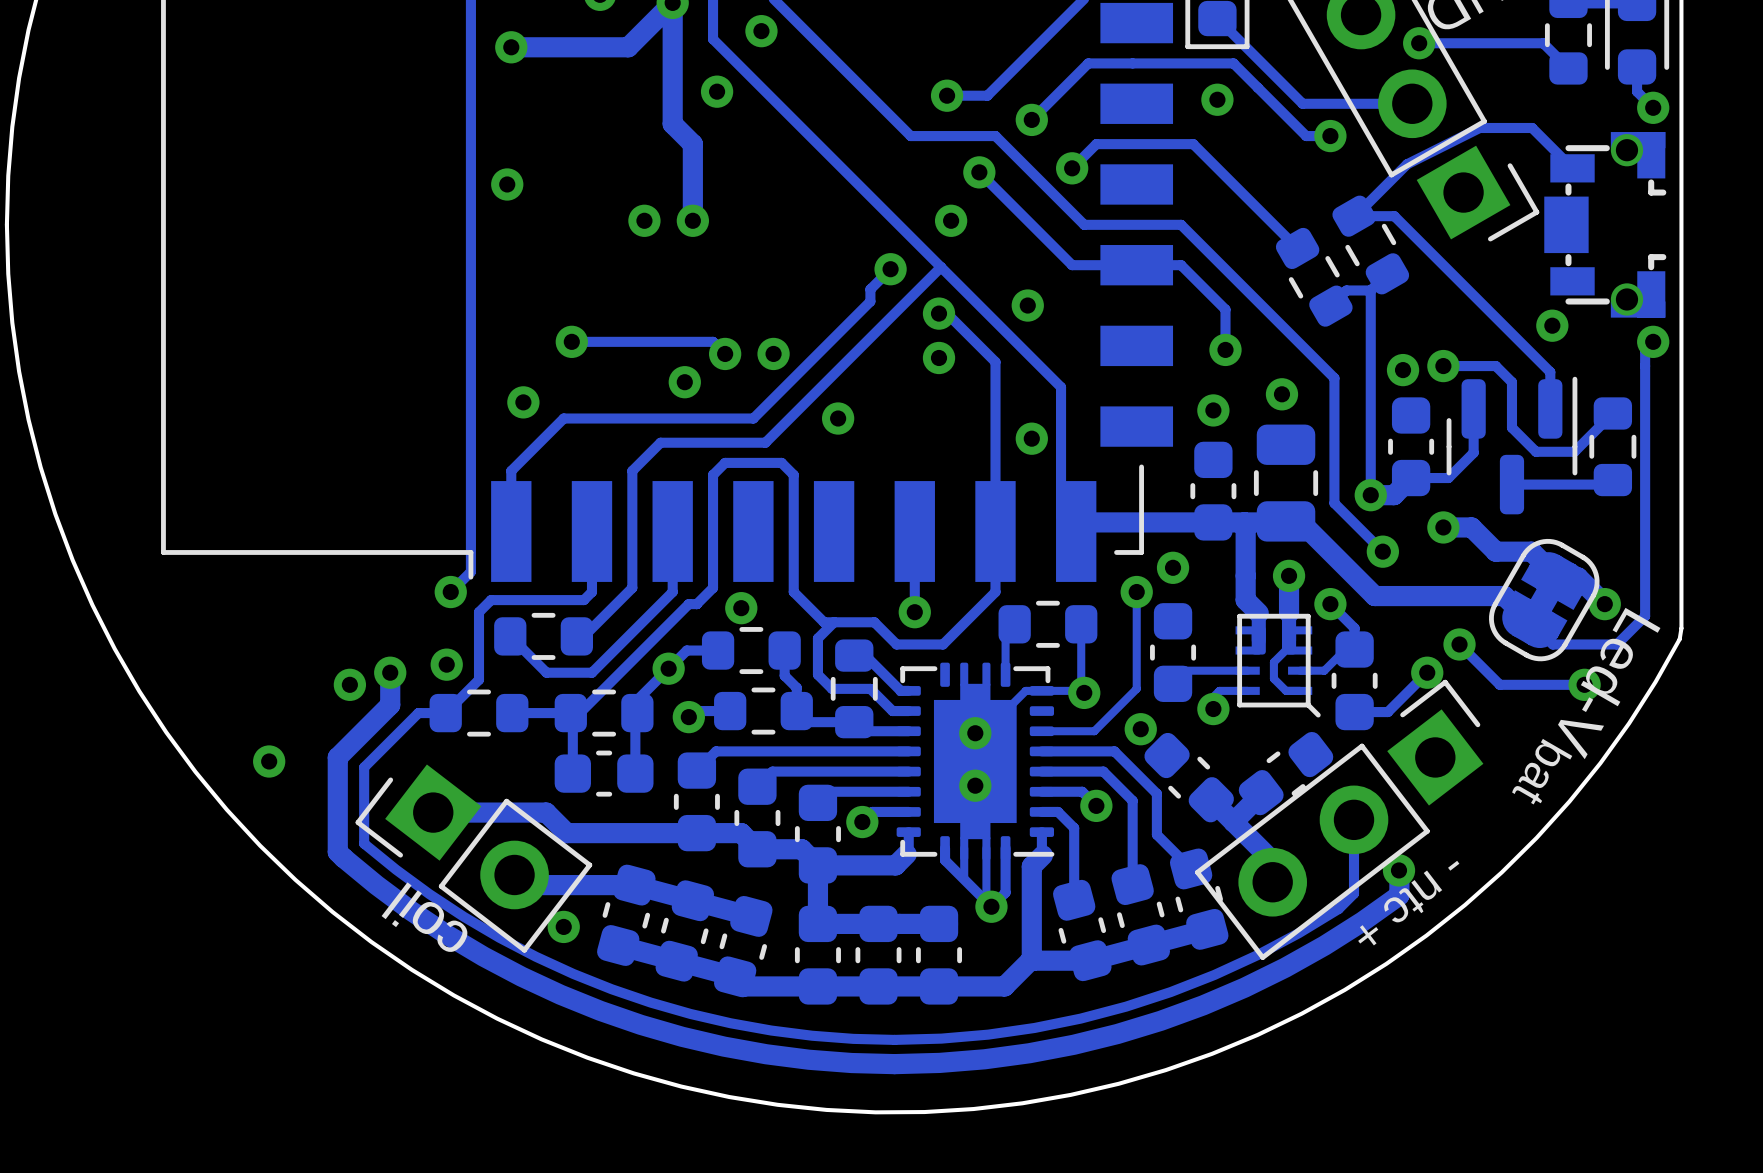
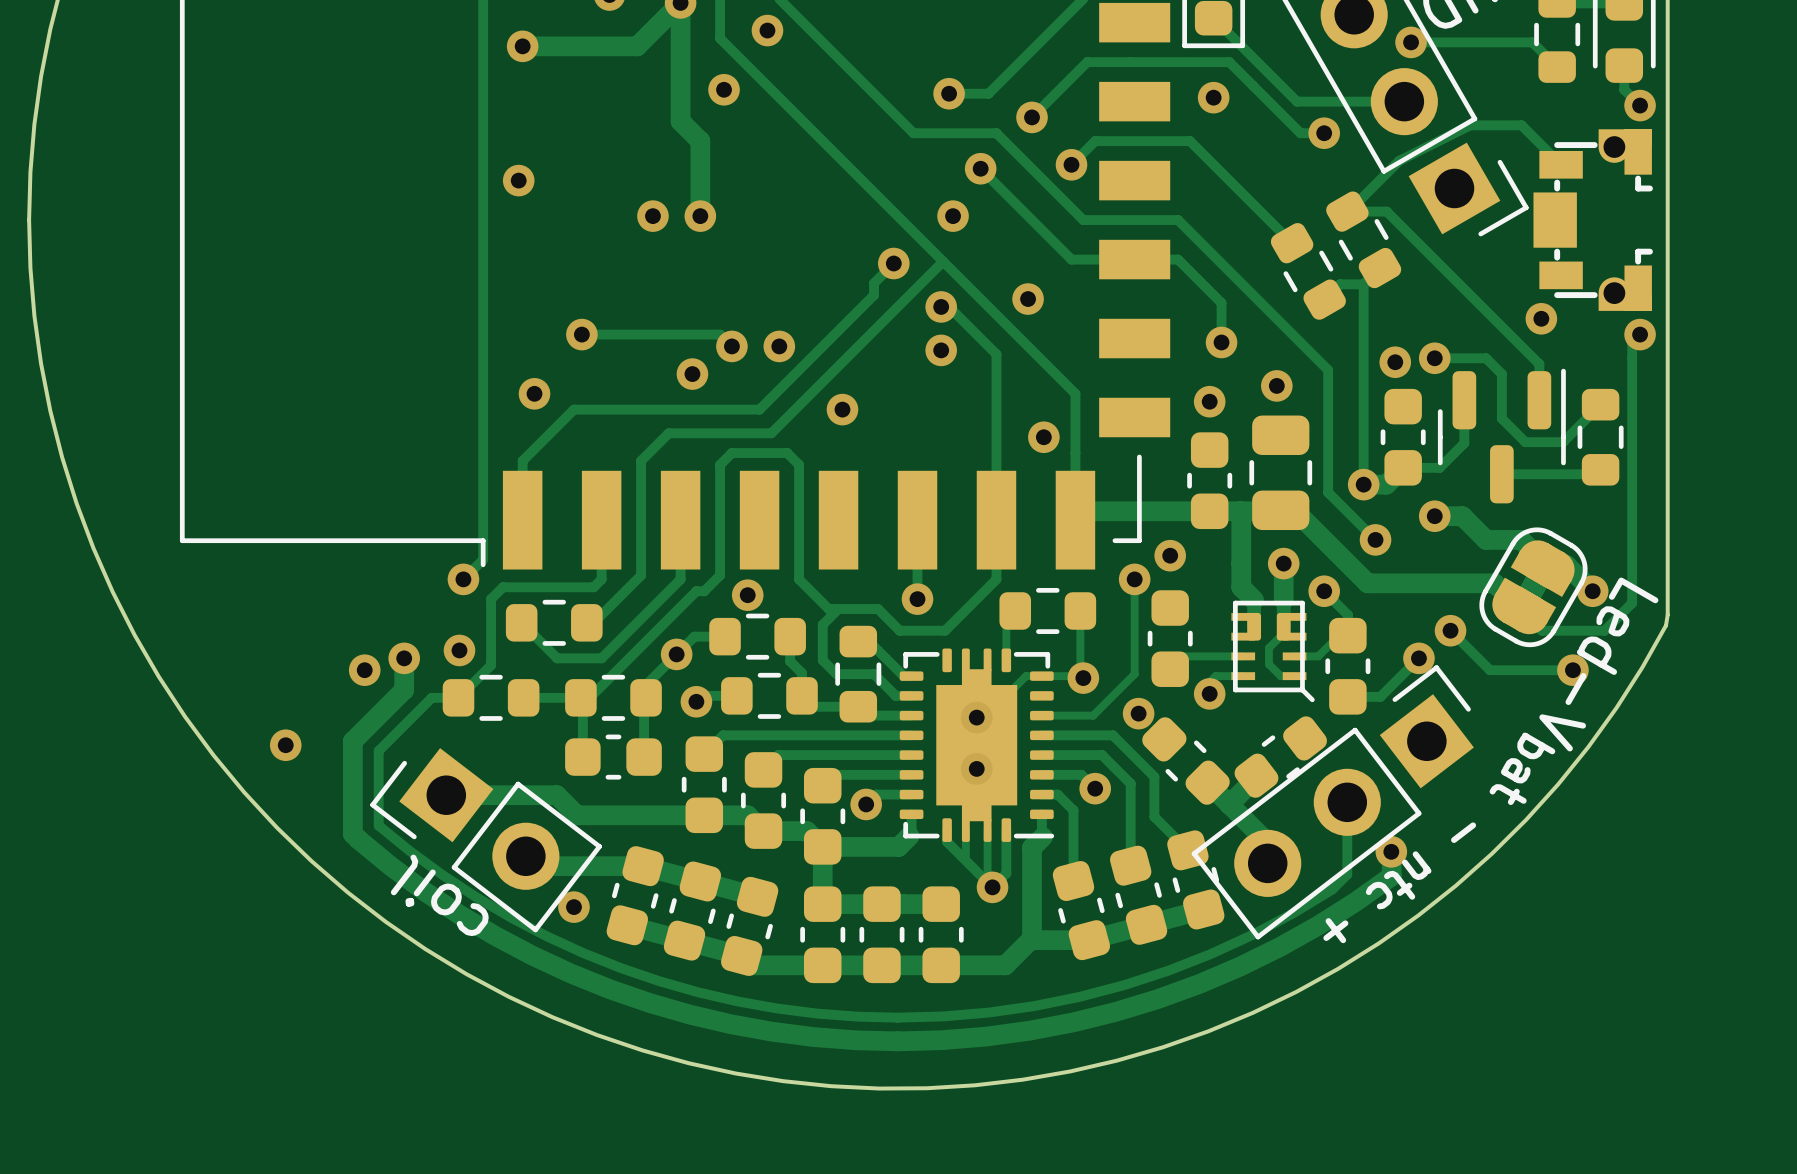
track: (1061, 387) (1061, 516) (1076, 531) -> (1060, 378) (1075, 393) (1075, 520)
via position: (1031, 438) -> (1043, 437)

